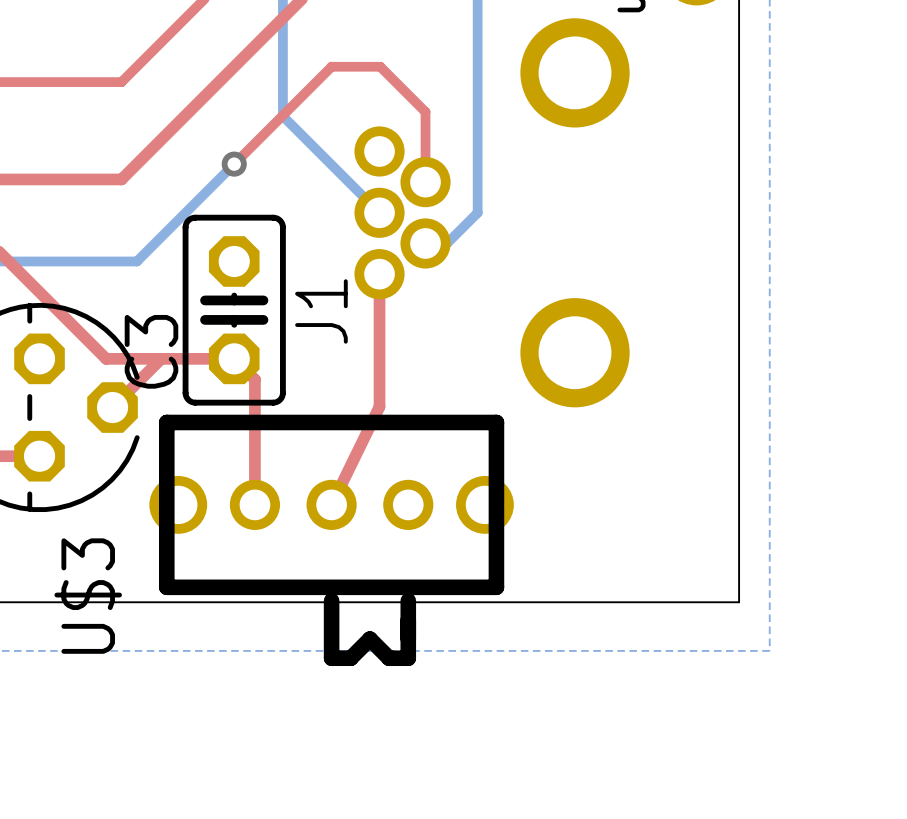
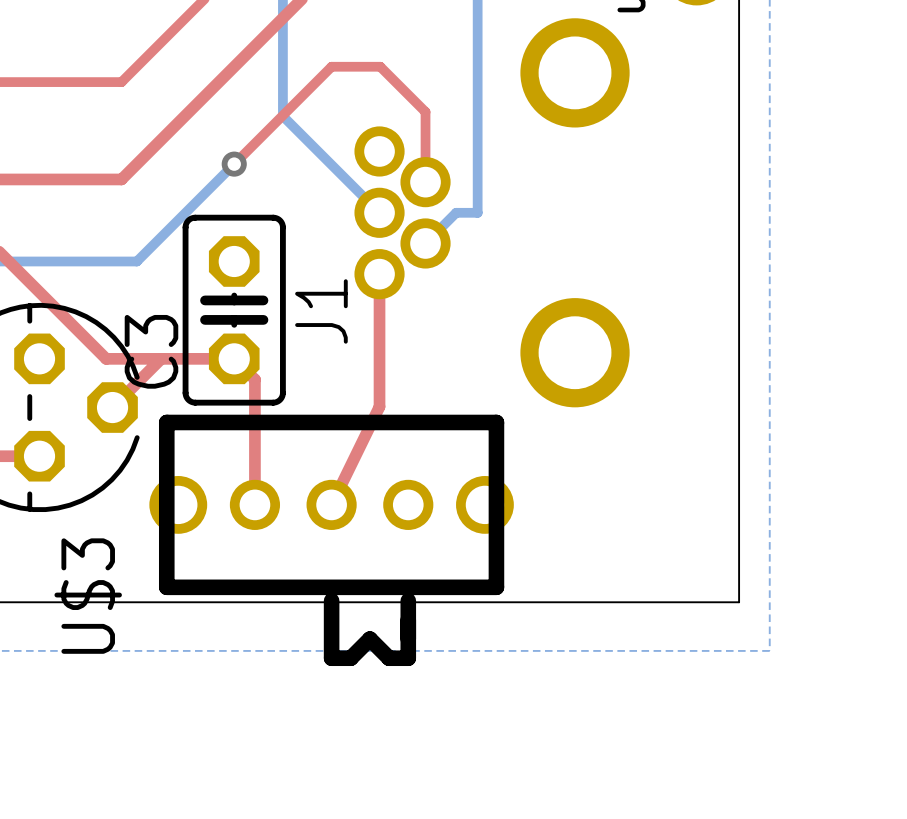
bottom track: (477, 212) (446, 243) (425, 243) -> (477, 212) (456, 212) (425, 243)

